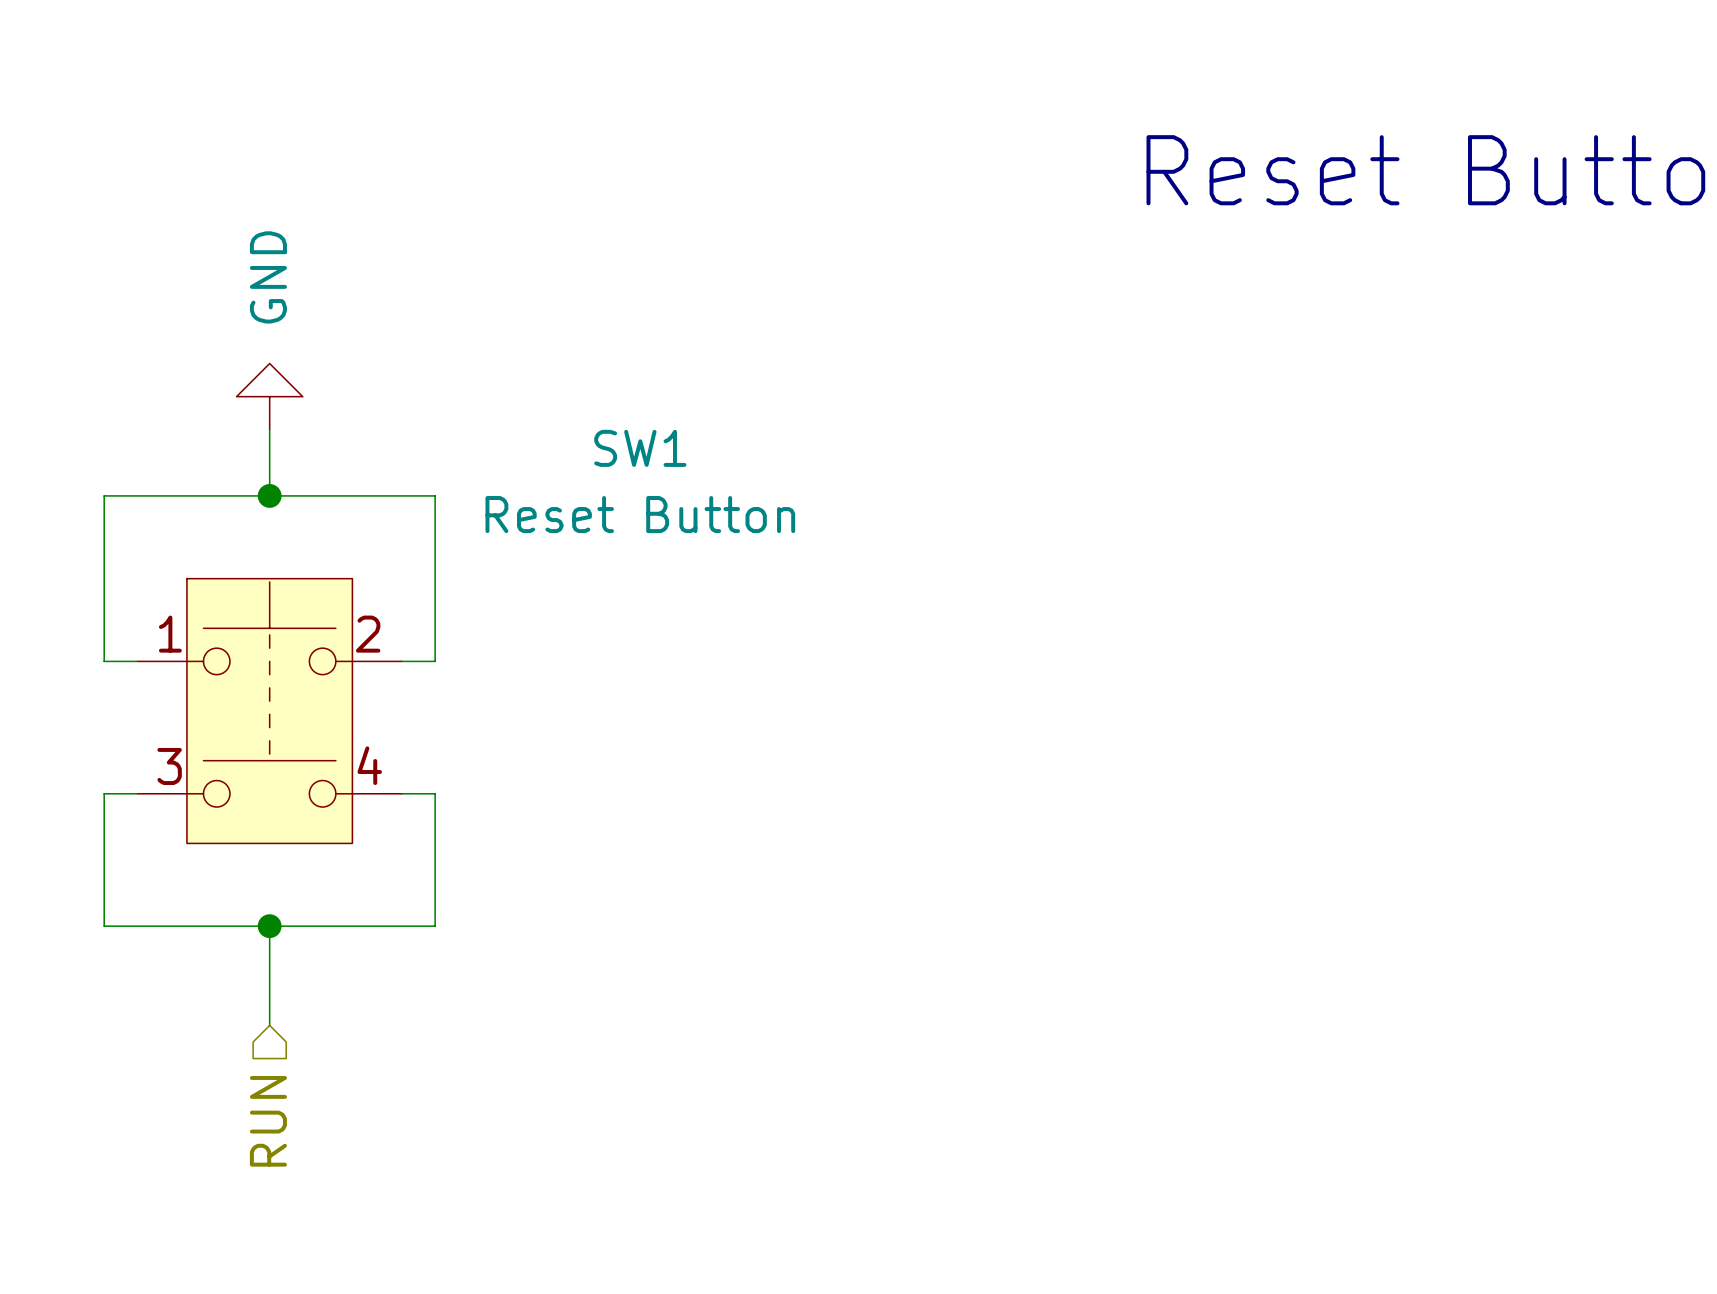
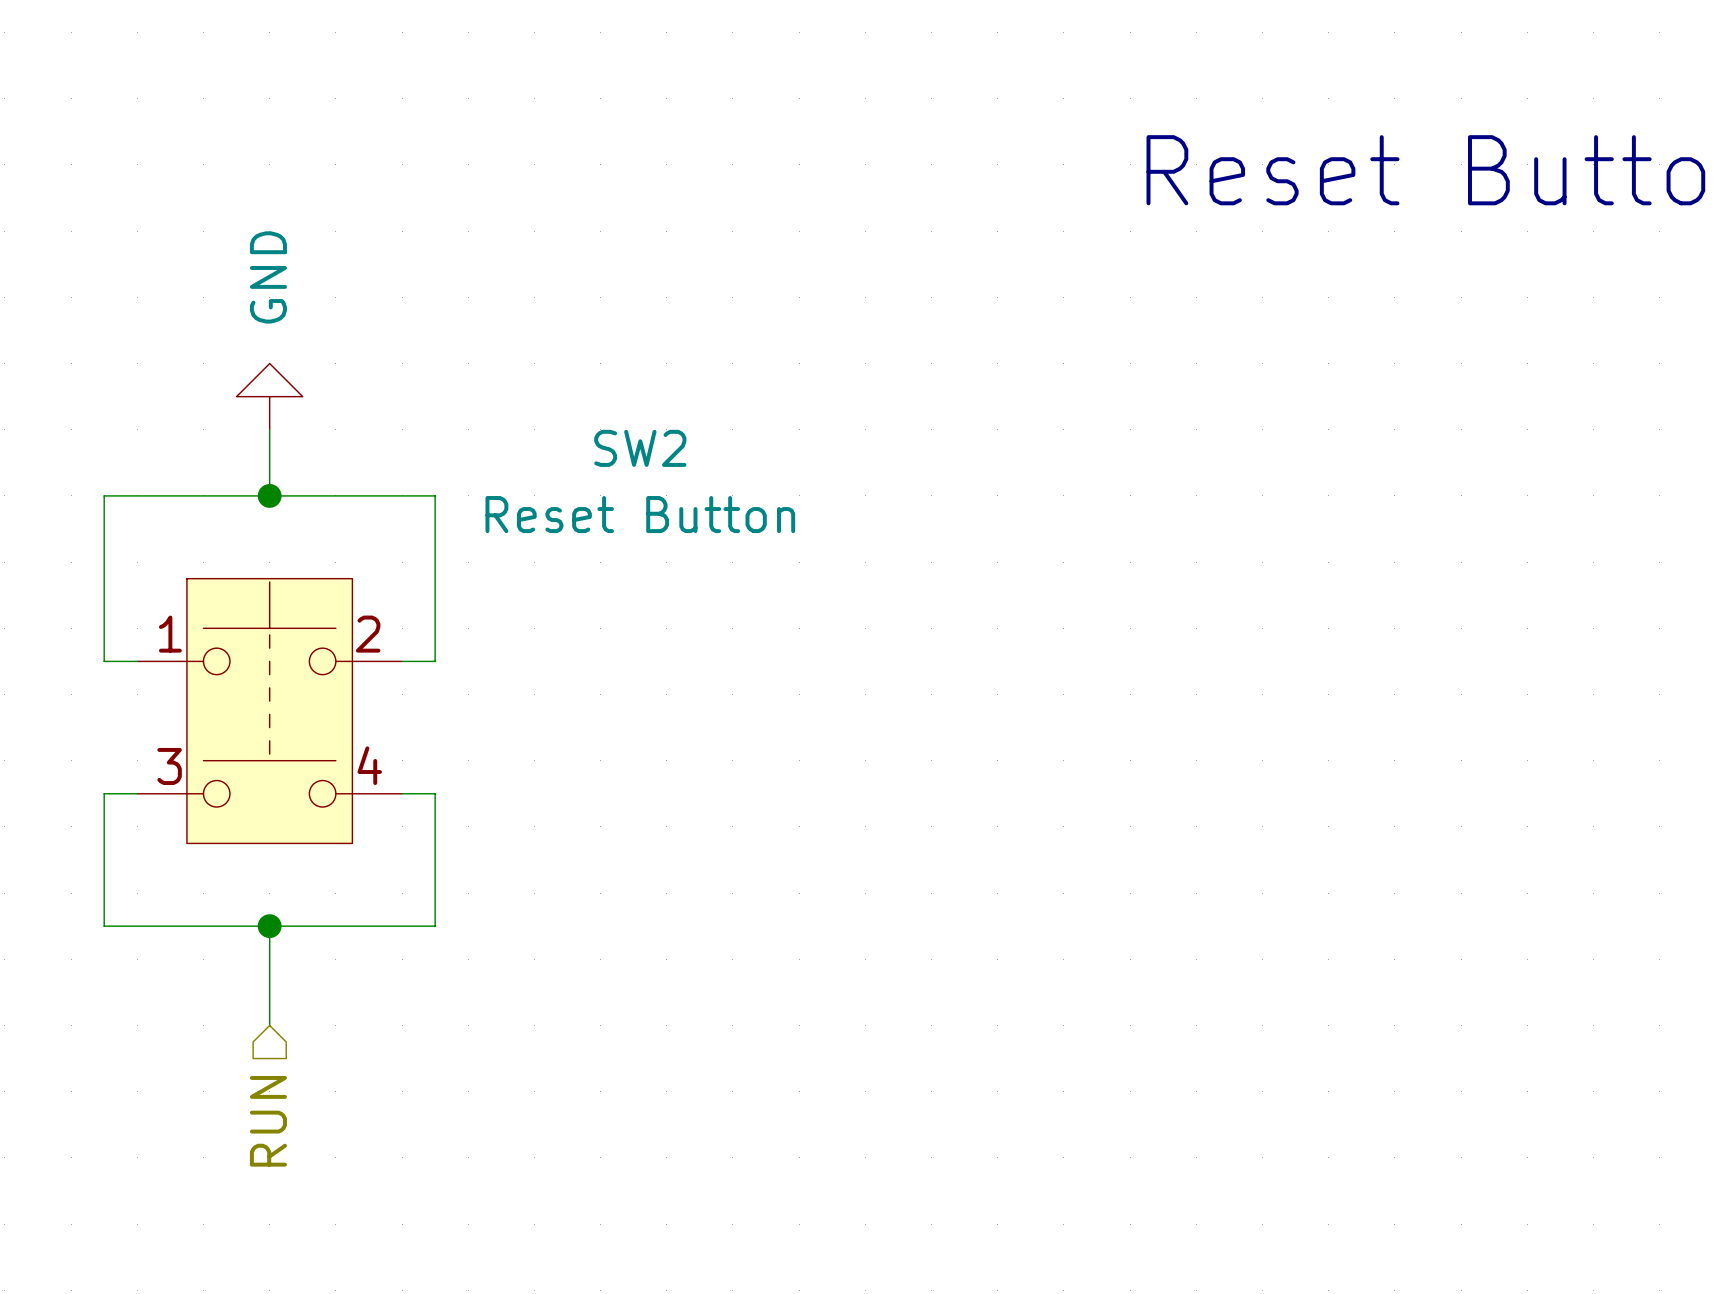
SW1 name: SW1 (640, 448) -> SW2 (640, 448)

